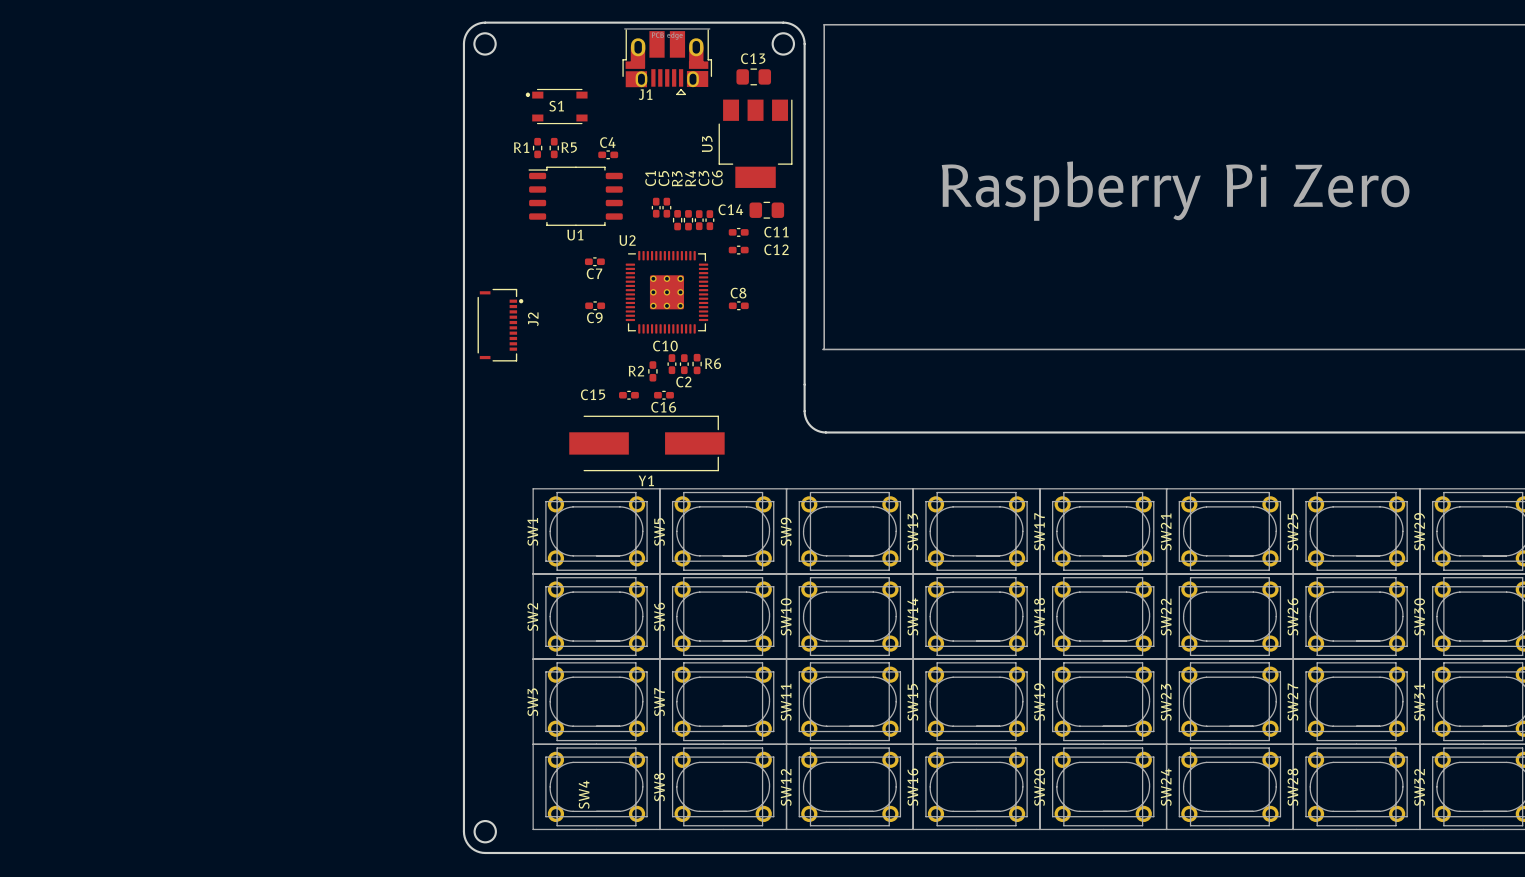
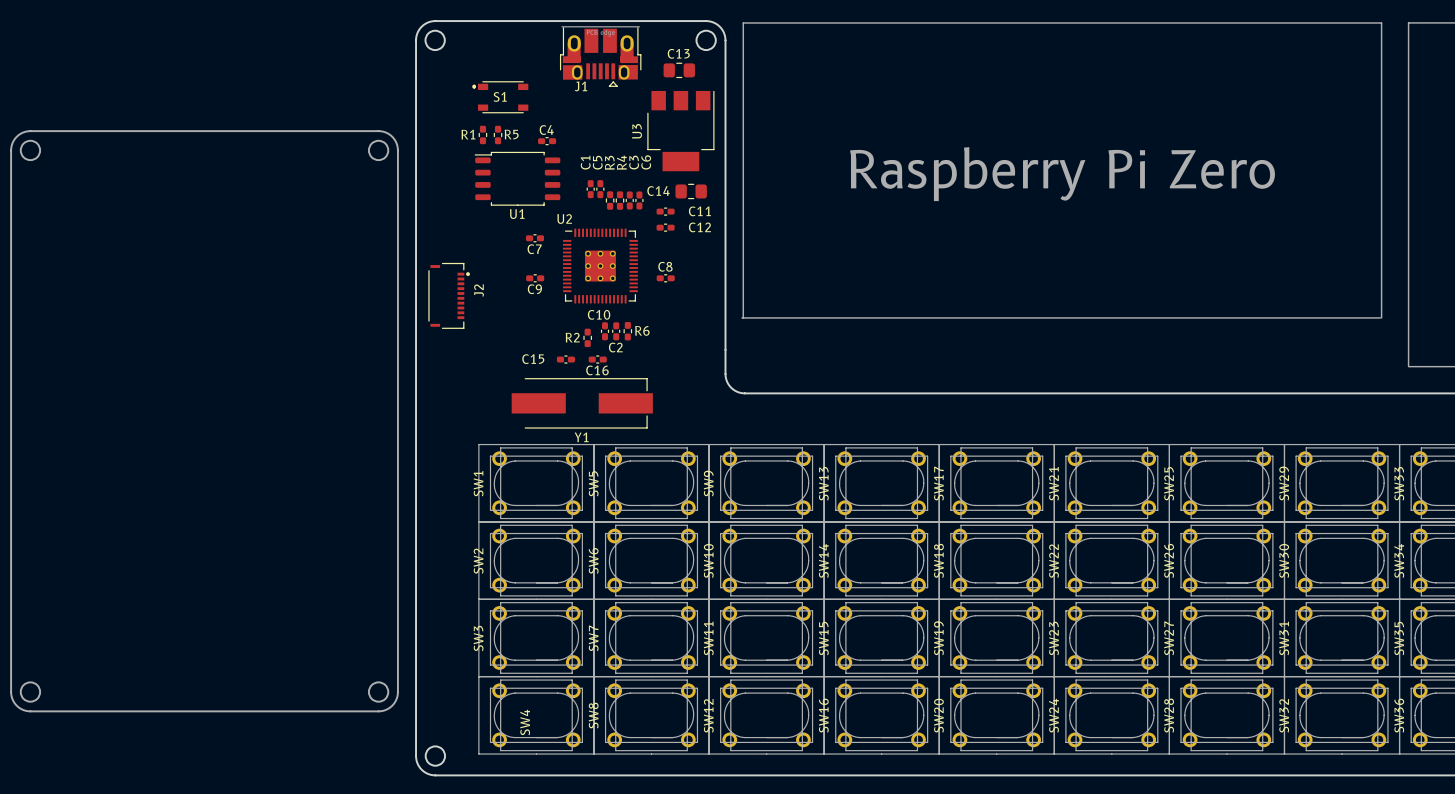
line: none -> (30, 131) (378, 131) (386, 133) (394, 140) (397, 150) (397, 692) (396, 700) (388, 708) (378, 711) (30, 711) (20, 708) (14, 702) (11, 692) (11, 150) (16, 136) (30, 131)
drawing: none -> [19, 139, 42, 162]
drawing: none -> [367, 139, 390, 162]
drawing: none -> [19, 681, 42, 703]
drawing: none -> [367, 681, 390, 703]

